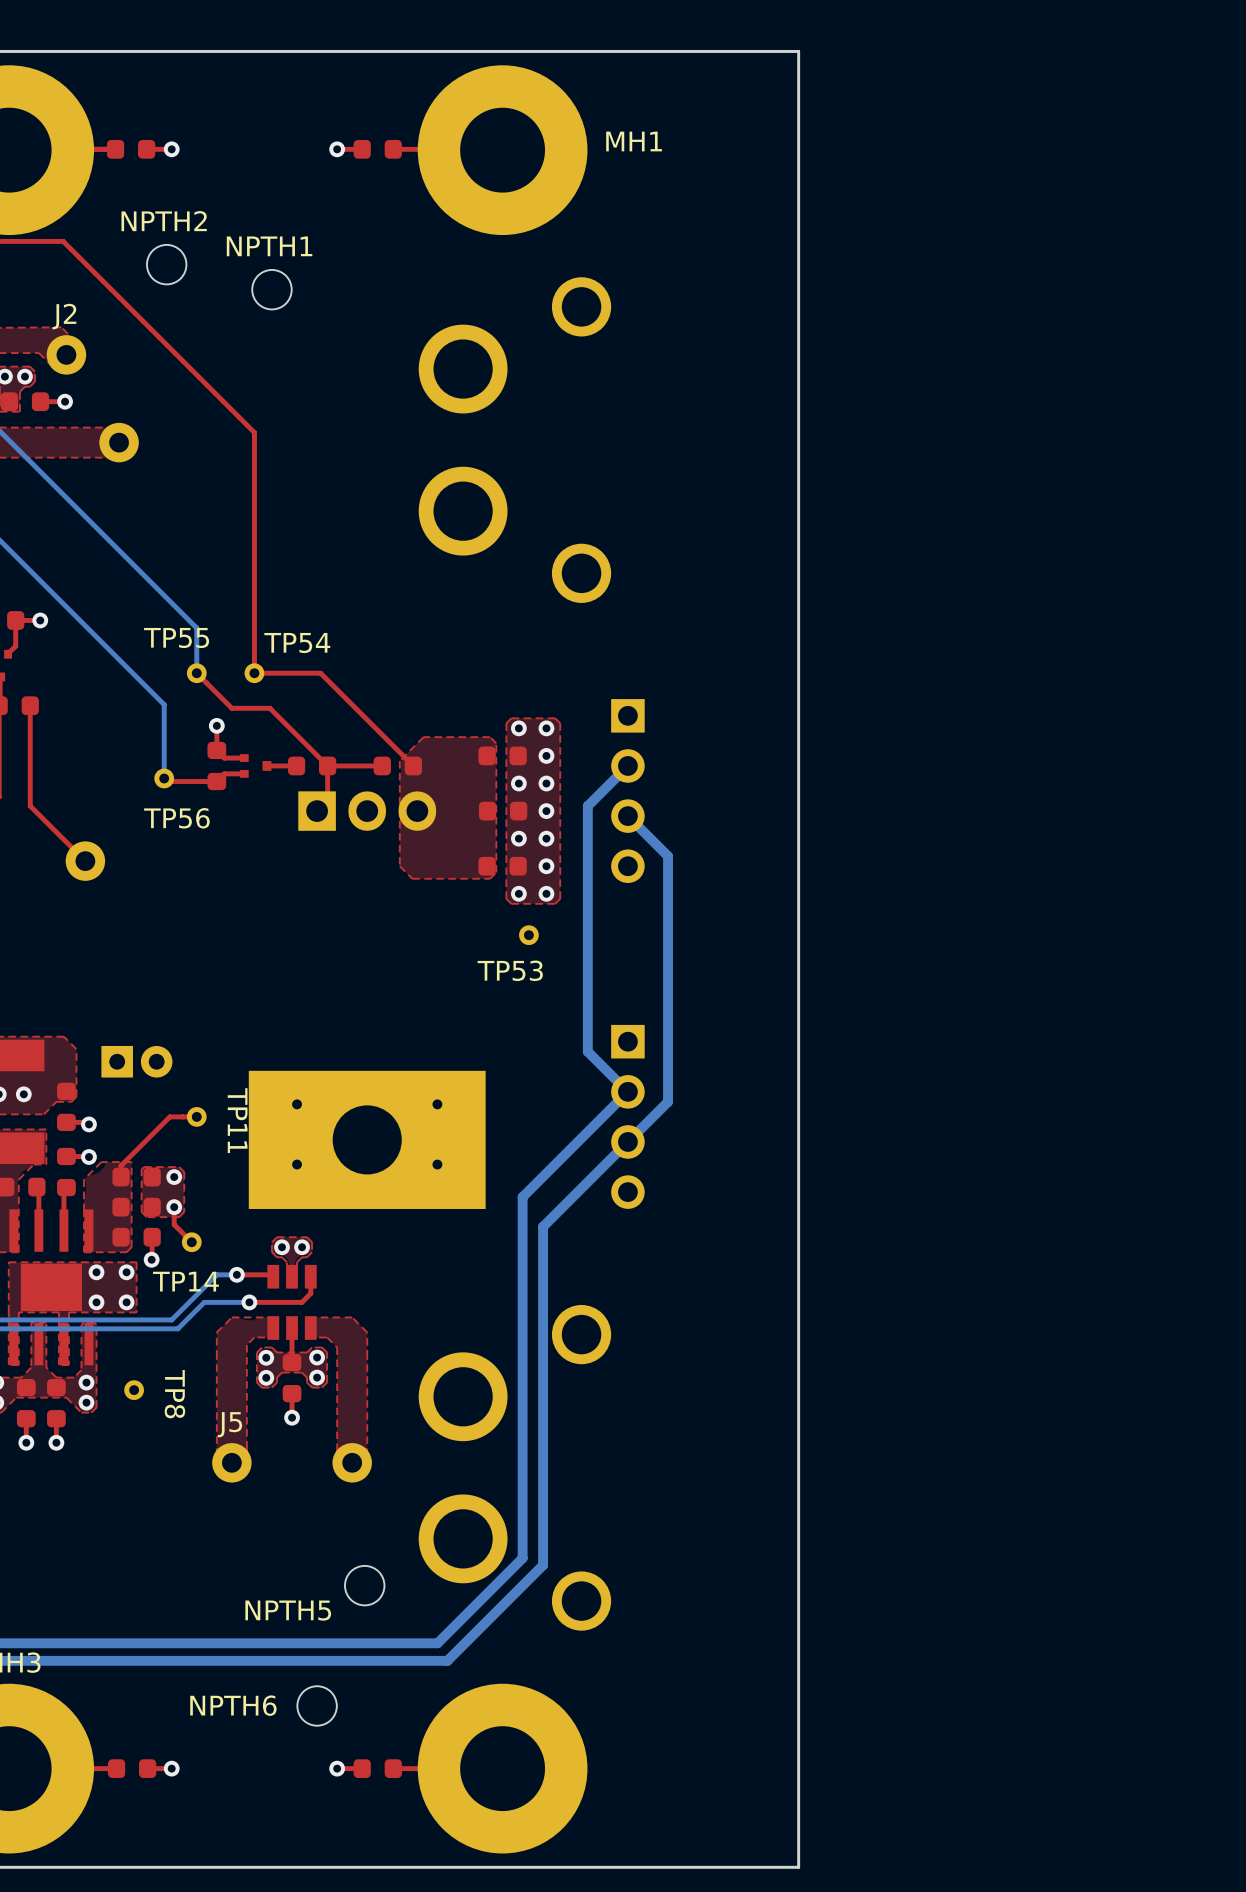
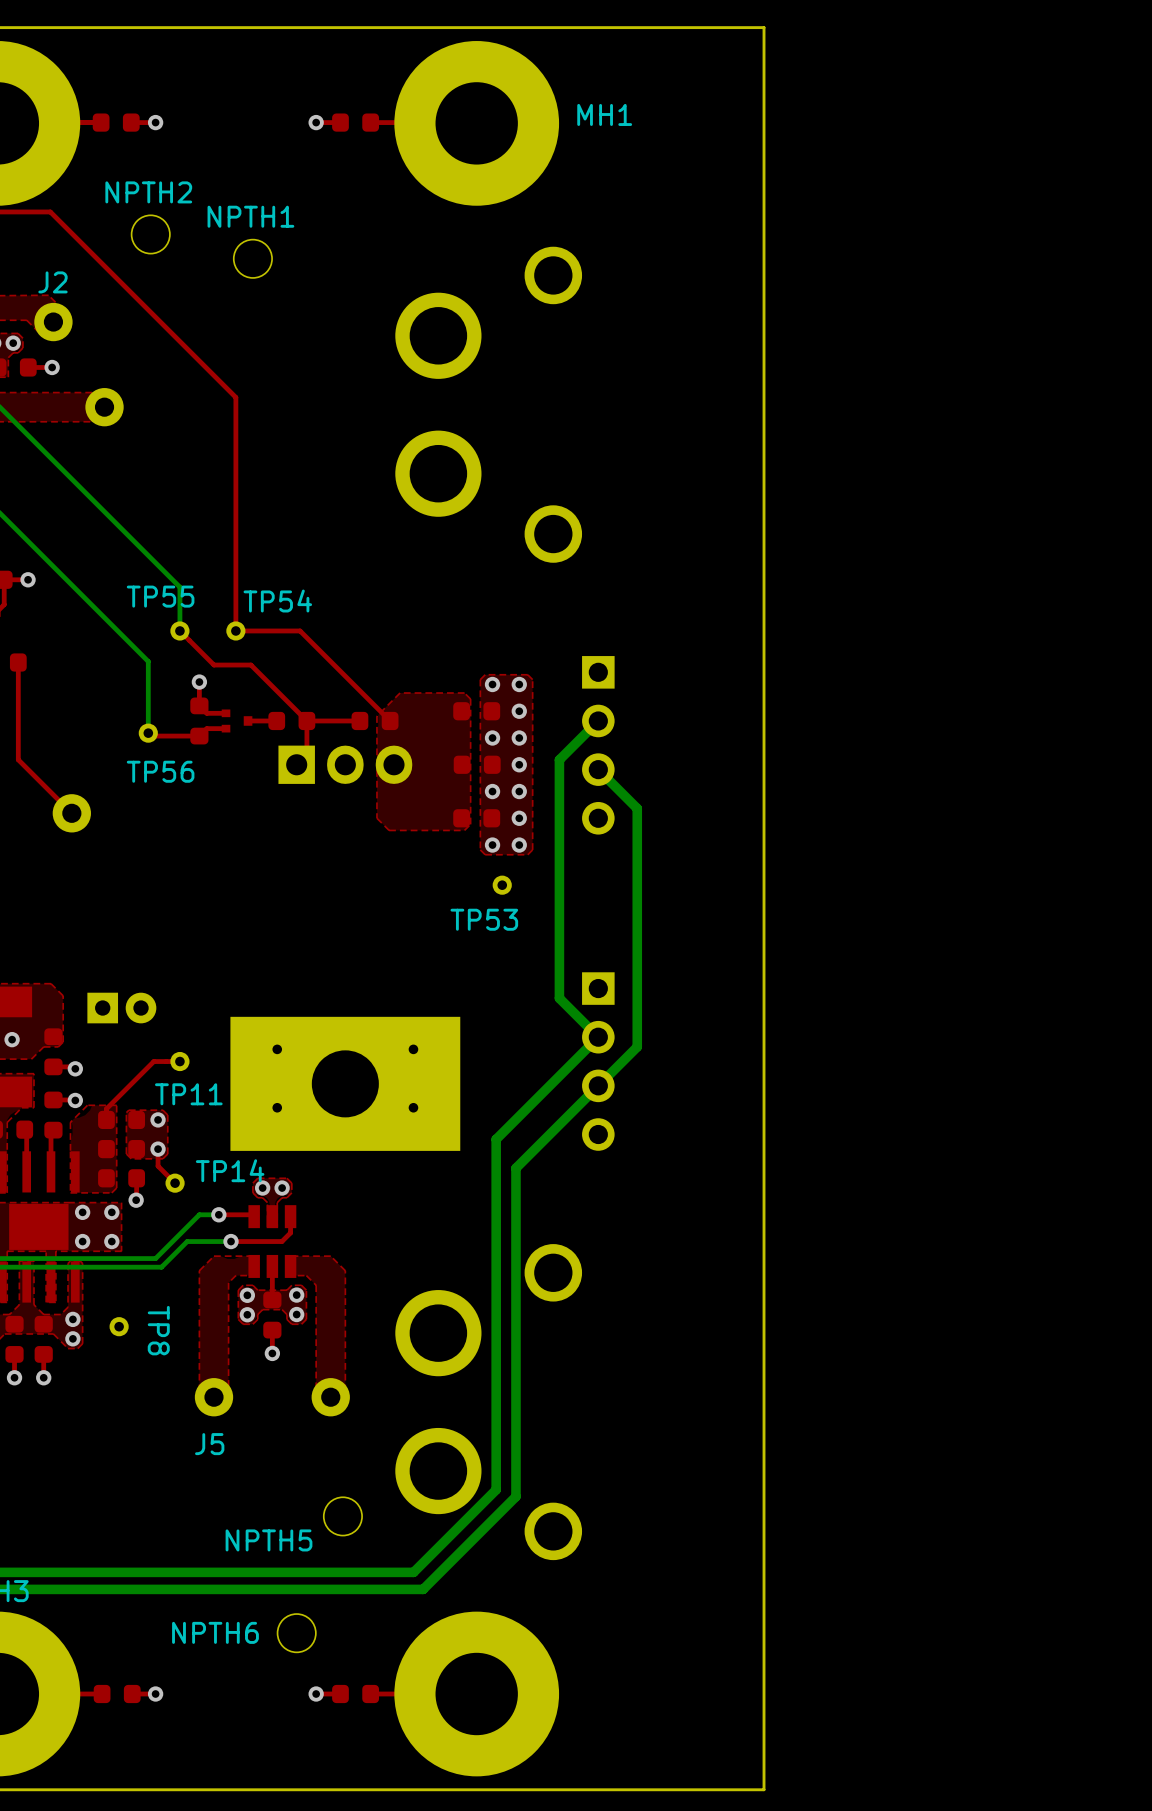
TP11 name rotation: 0° (237, 1120) -> 90° counterclockwise (188, 1094)
TP14 name position: TP14 (185, 1281) -> TP14 (230, 1170)
J5 name position: J5 (229, 1424) -> J5 (209, 1444)

